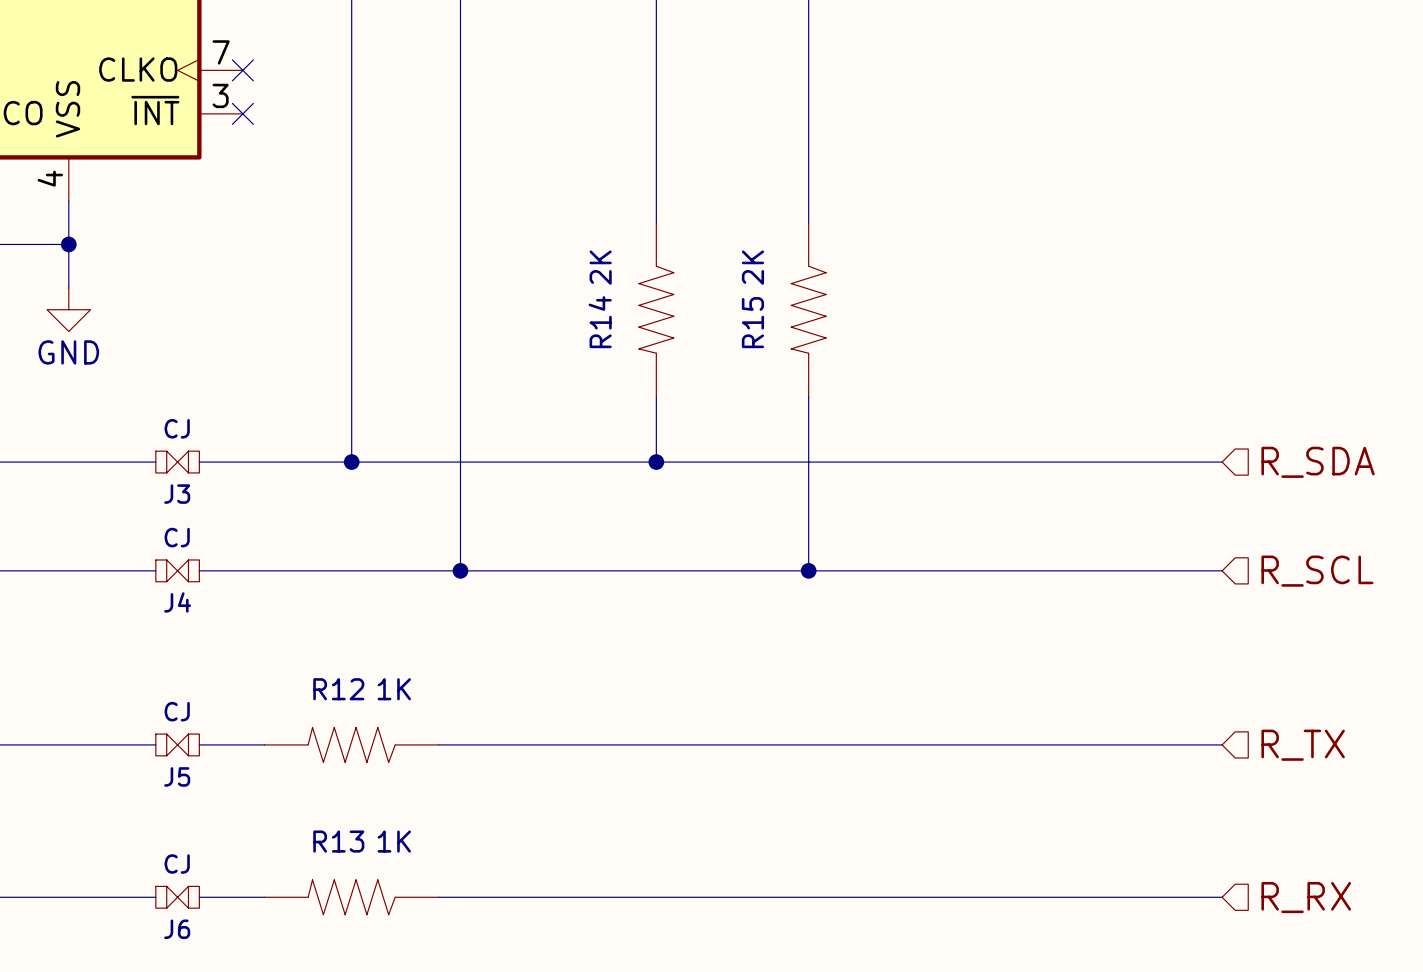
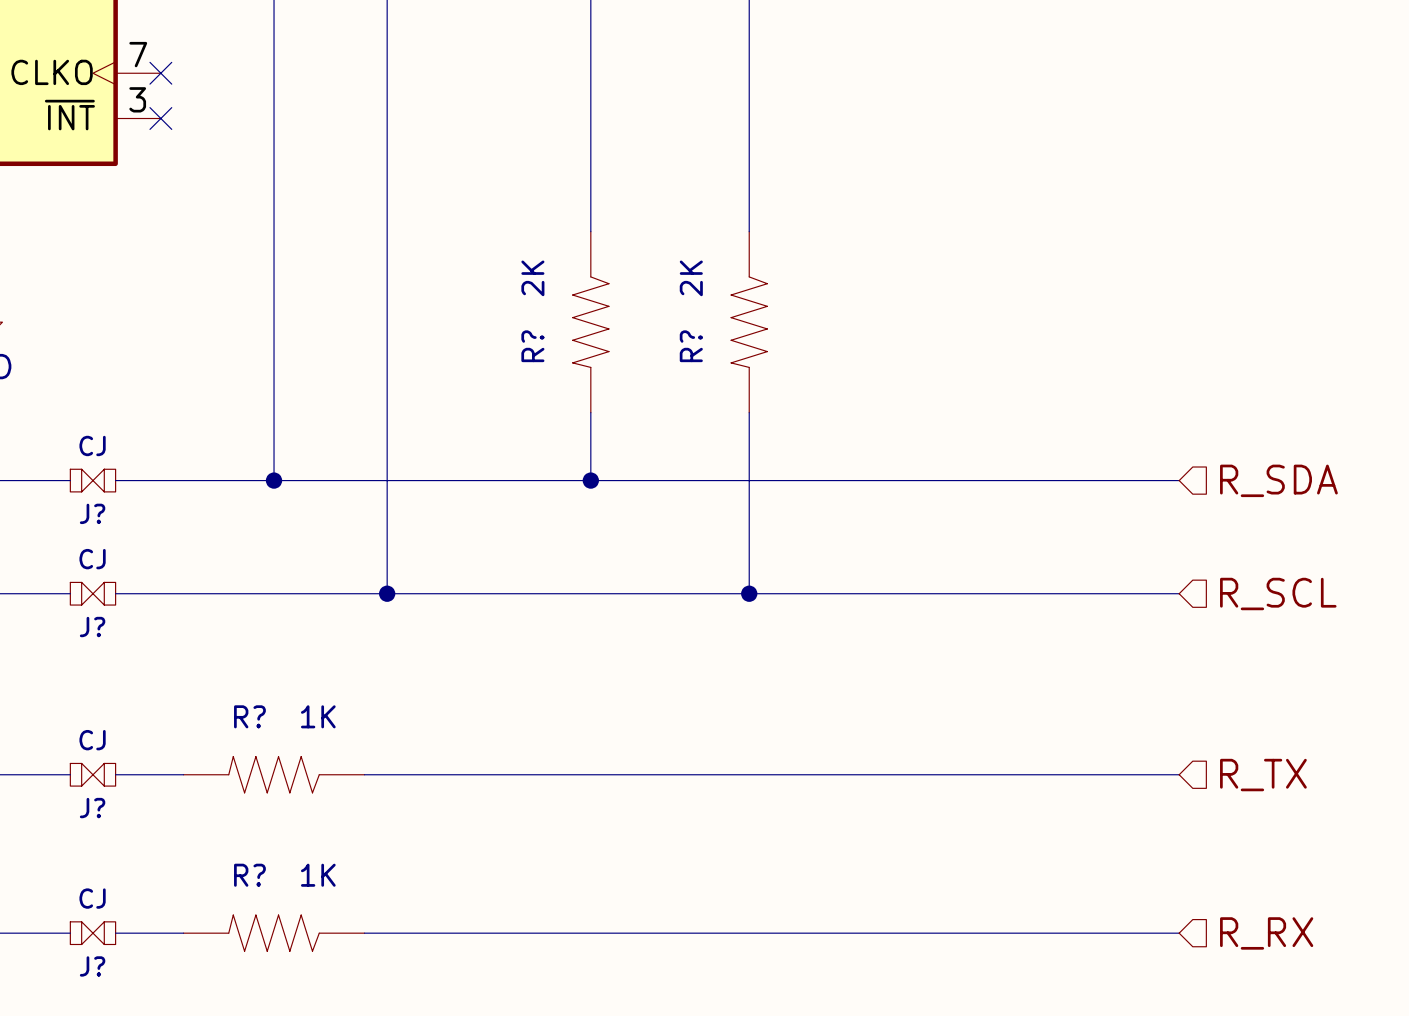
R14 name: R14 (600, 322) -> R? (532, 346)
R15 name: R15 (752, 322) -> R? (691, 346)
J3 name: J3 (177, 494) -> J? (92, 513)
J4 name: J4 (177, 602) -> J? (92, 627)
R12 name: R12 (338, 689) -> R? (249, 716)
J5 name: J5 (177, 776) -> J? (92, 808)
R13 name: R13 (338, 841) -> R? (249, 875)
J6 name: J6 (177, 929) -> J? (92, 966)

